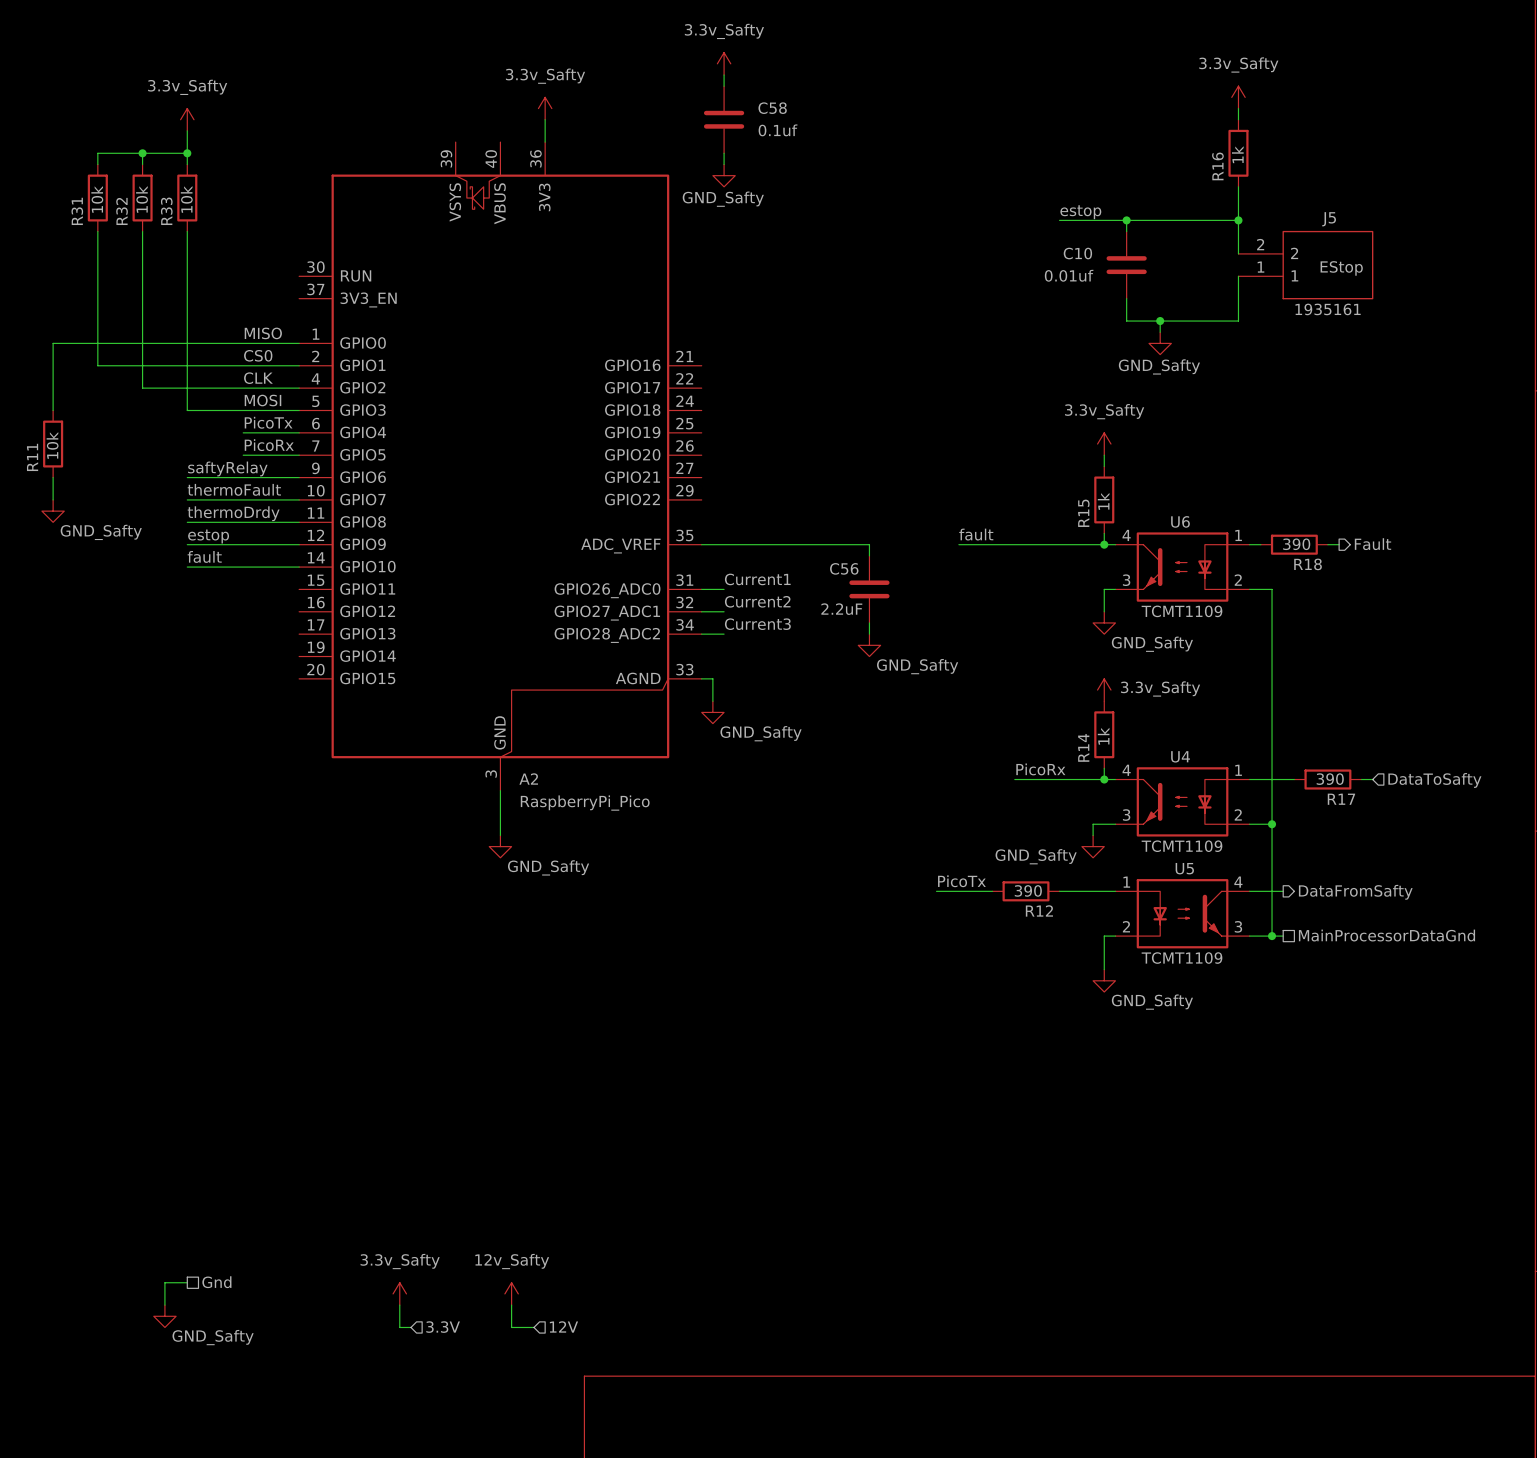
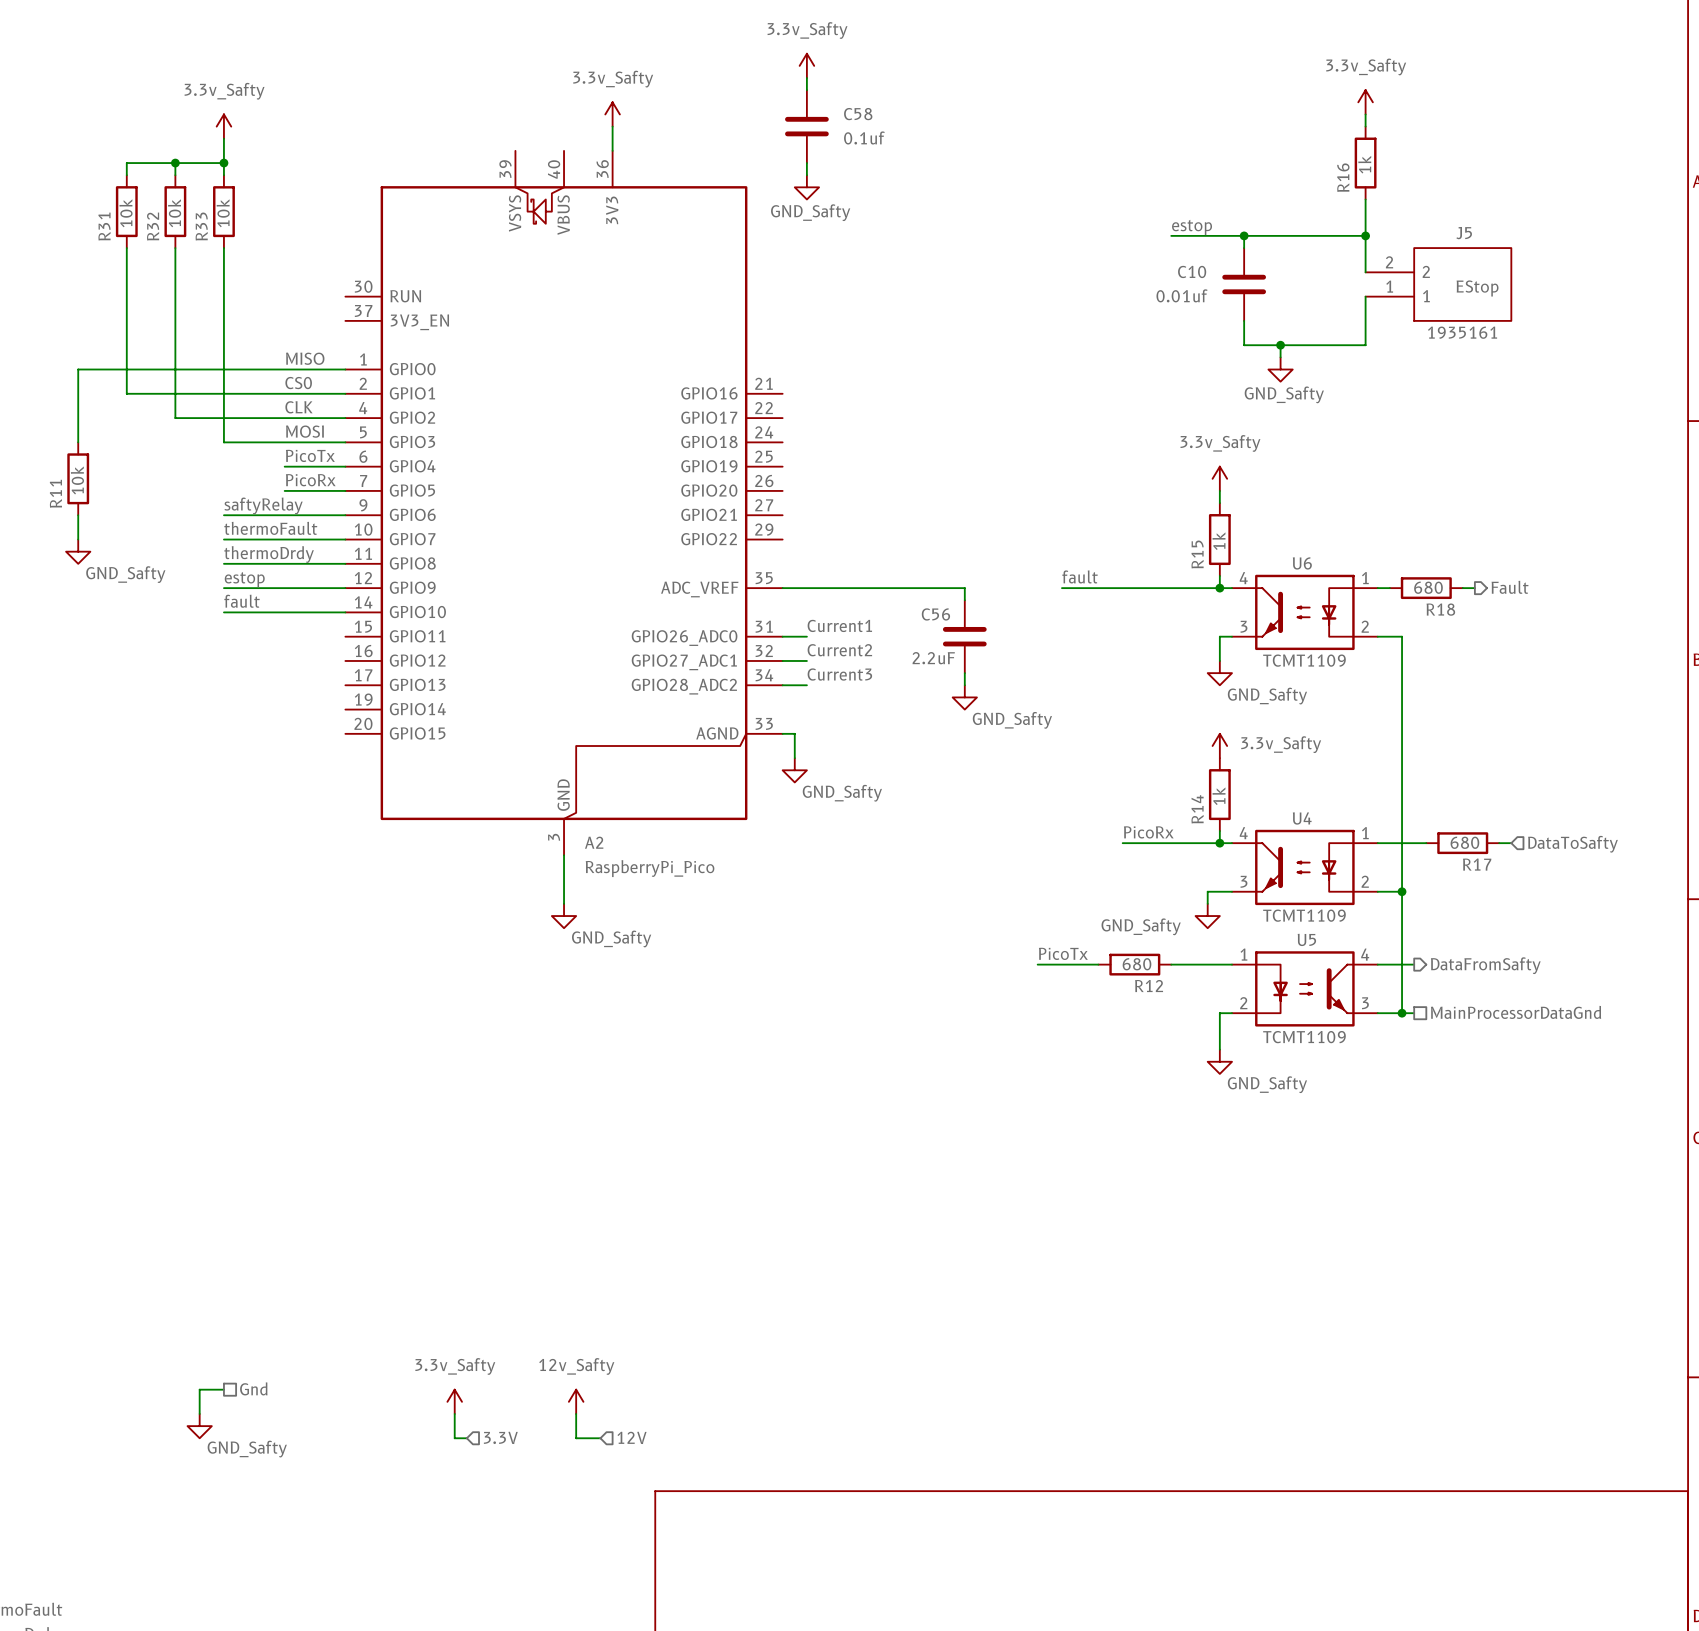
R18 value: 390 (1296, 544) -> 680 (1428, 587)
R17 value: 390 (1330, 779) -> 680 (1464, 842)
R12 value: 390 (1028, 890) -> 680 (1137, 964)

